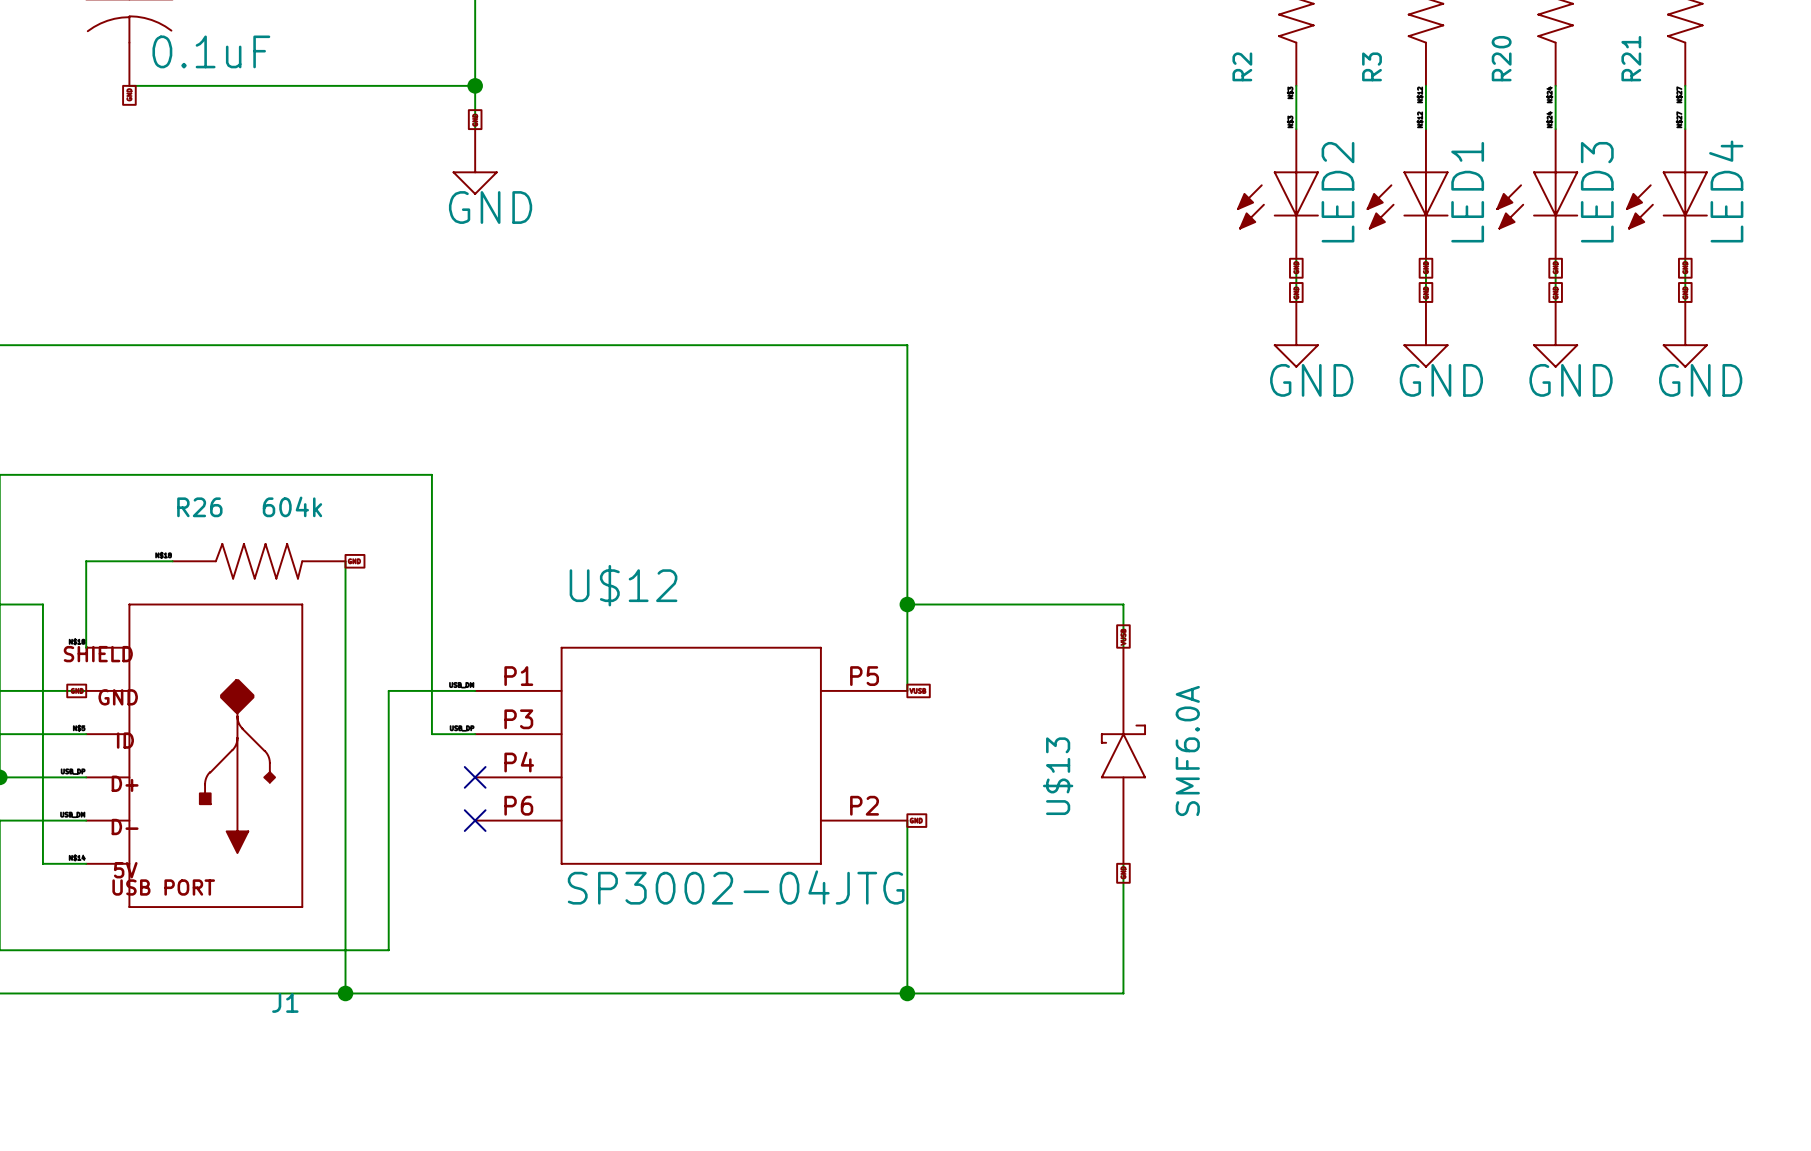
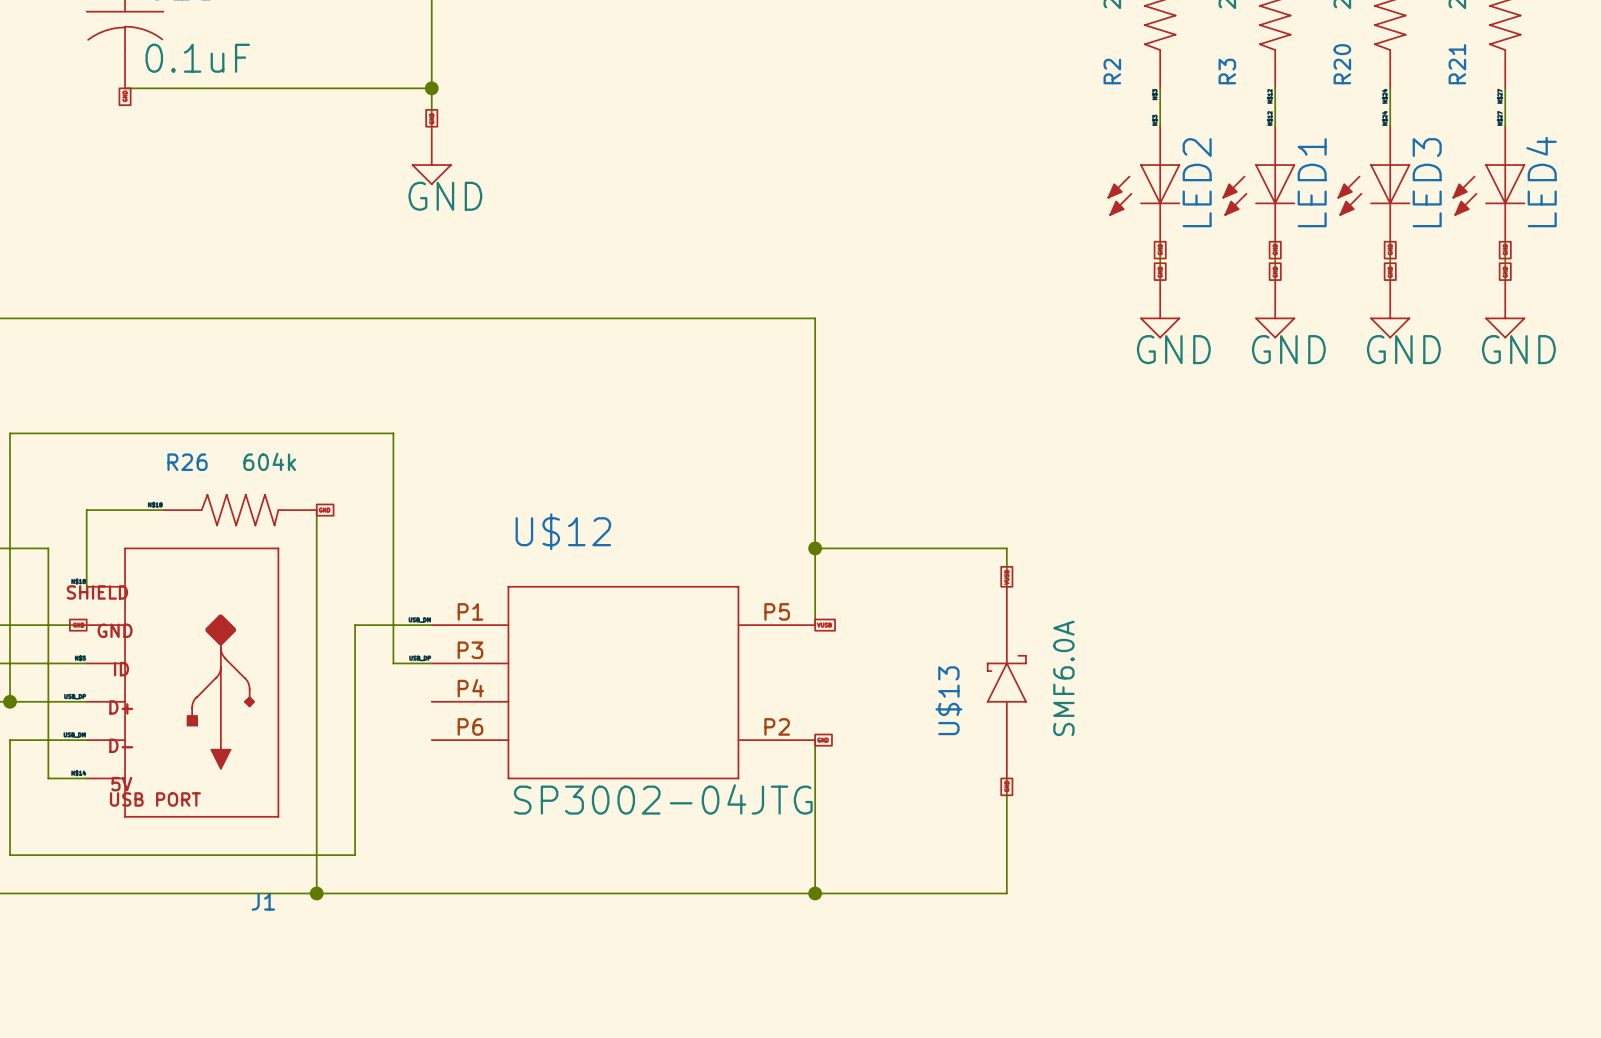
no-connect mark: (475, 777) -> none
no-connect mark: (475, 820) -> none

